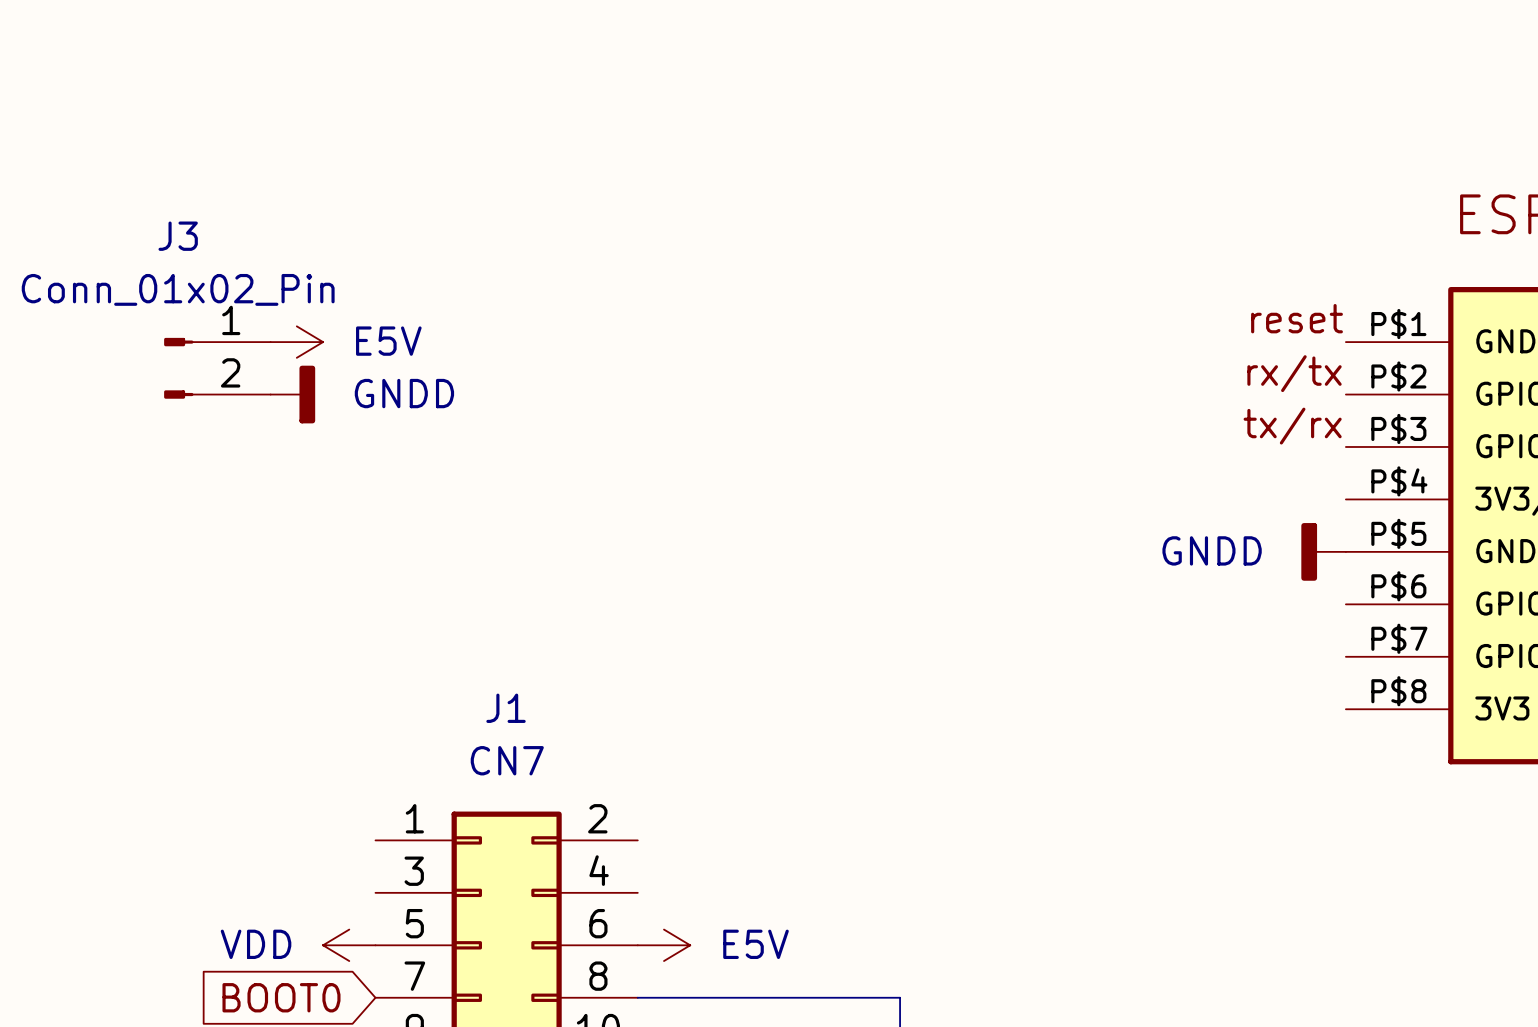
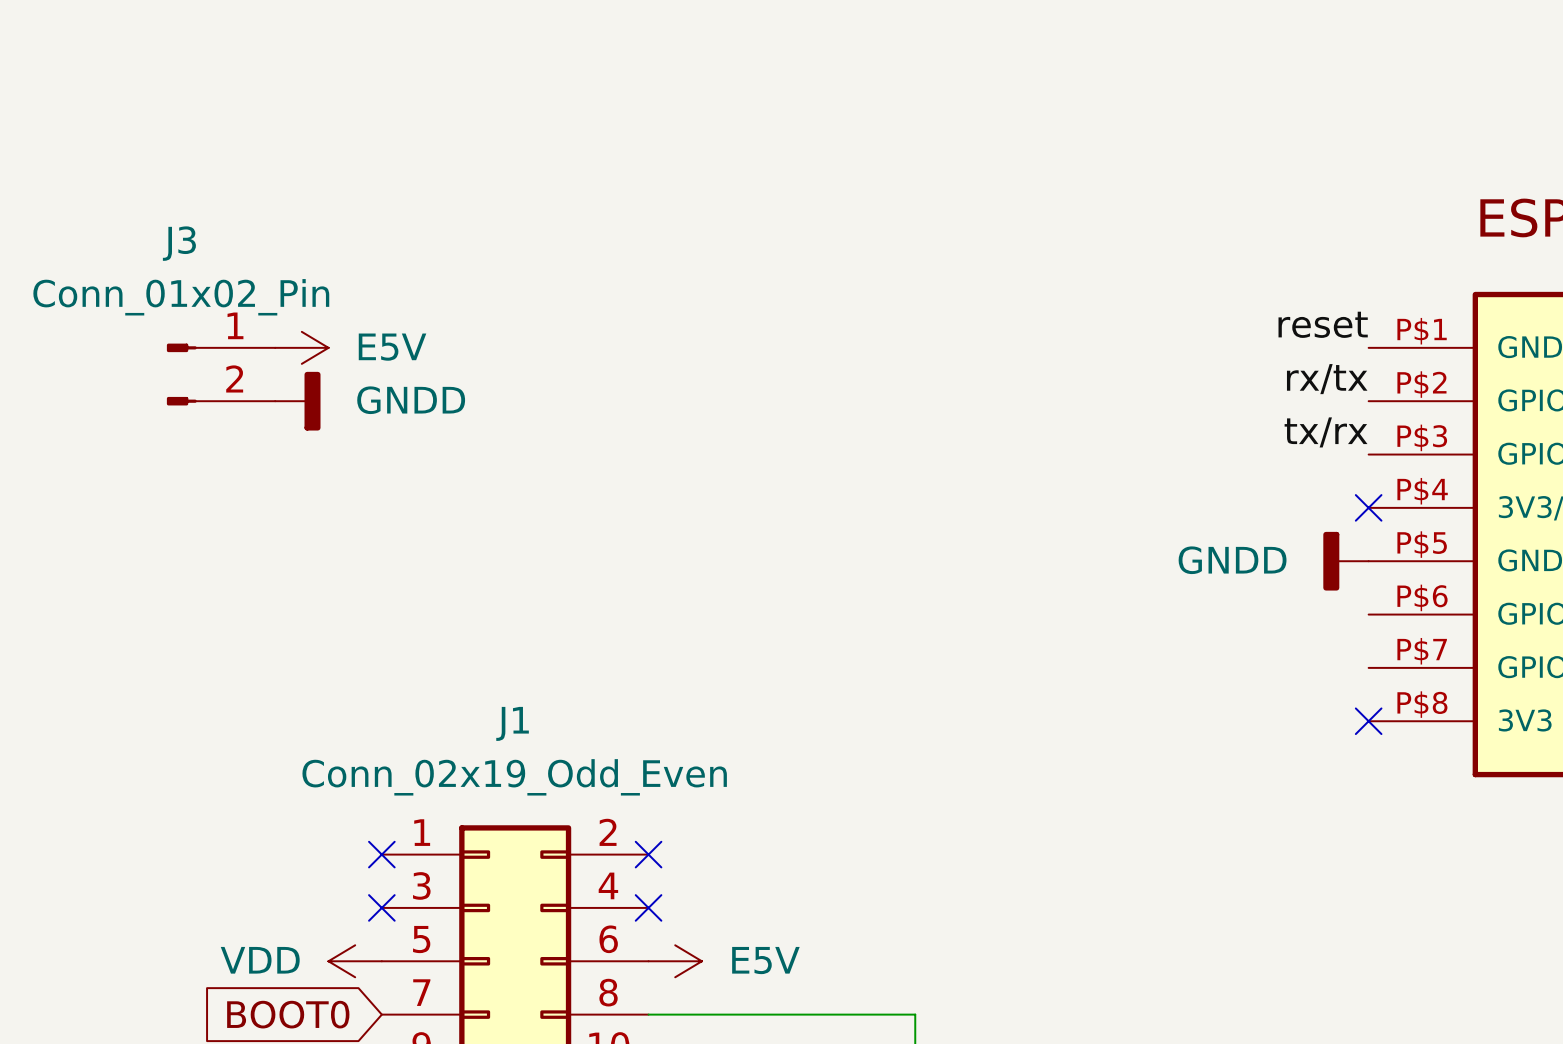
no-connect mark: none -> (1368, 507)
no-connect mark: none -> (1368, 721)
J1 value: CN7 (507, 760) -> Conn_02x19_Odd_Even (514, 777)
no-connect mark: none -> (381, 854)
no-connect mark: none -> (648, 854)
no-connect mark: none -> (381, 907)
no-connect mark: none -> (648, 907)

